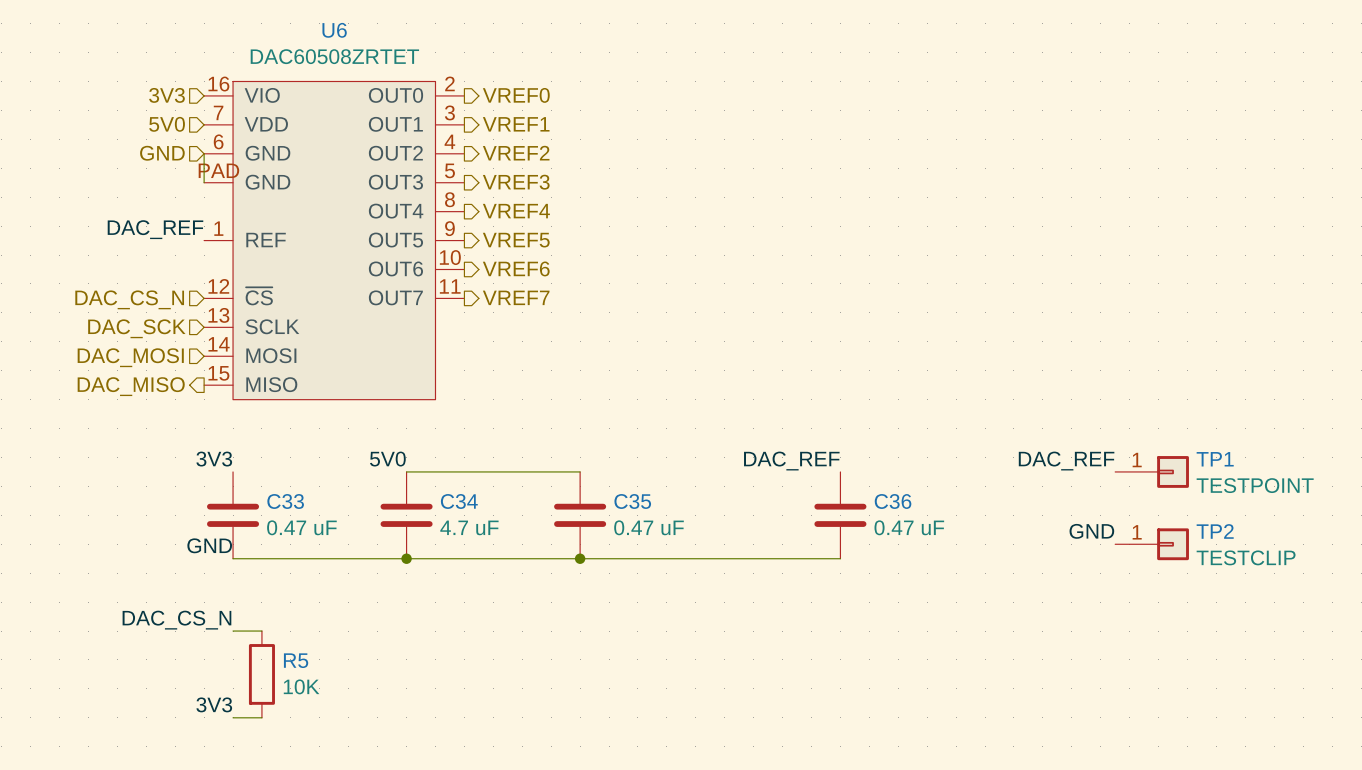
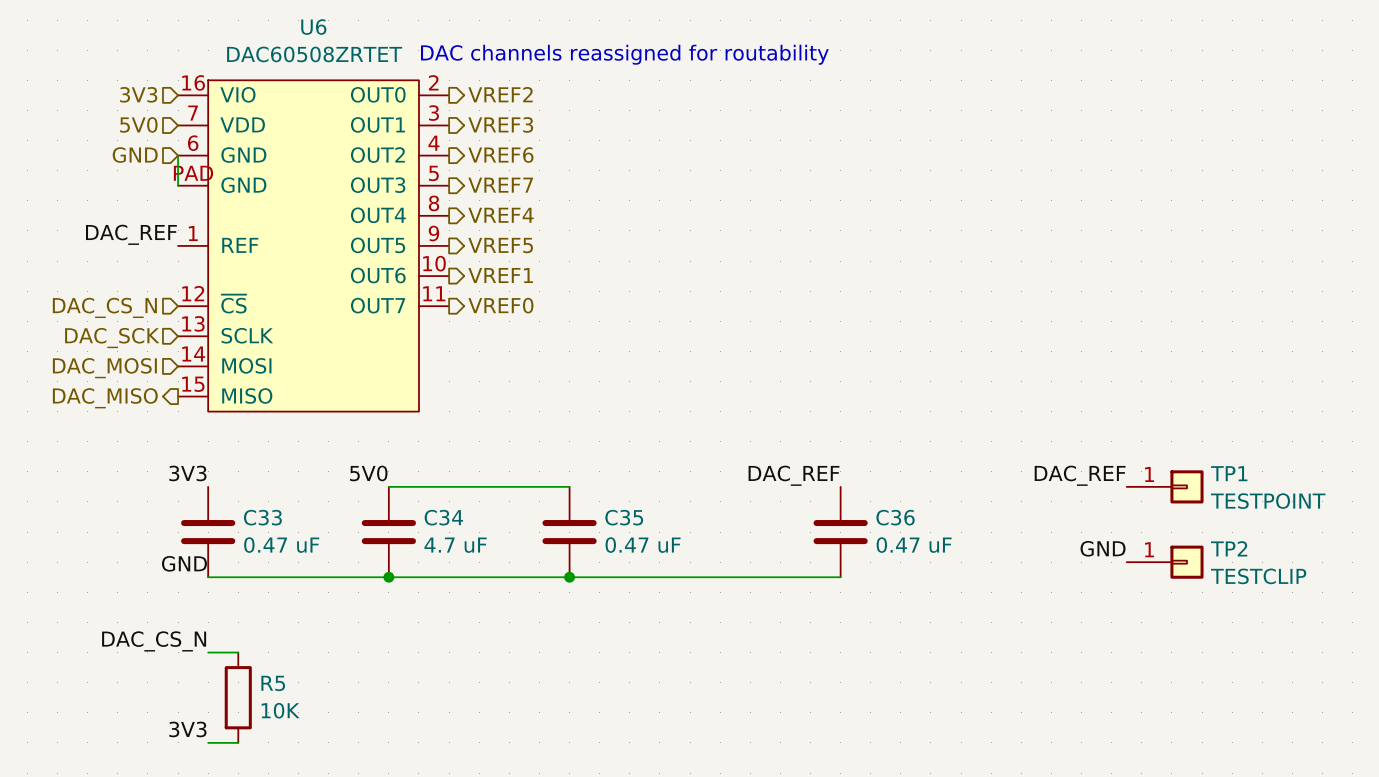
text: none -> DAC channels reassigned for routability (624, 54)
hierarchical label: VREF0 (516, 95) -> VREF2 (500, 94)
hierarchical label: VREF1 (516, 124) -> VREF3 (500, 124)
hierarchical label: VREF2 (516, 153) -> VREF6 (500, 155)
hierarchical label: VREF3 (516, 182) -> VREF7 (500, 185)
hierarchical label: VREF6 (516, 268) -> VREF1 (500, 275)
hierarchical label: VREF7 (516, 297) -> VREF0 (500, 305)

